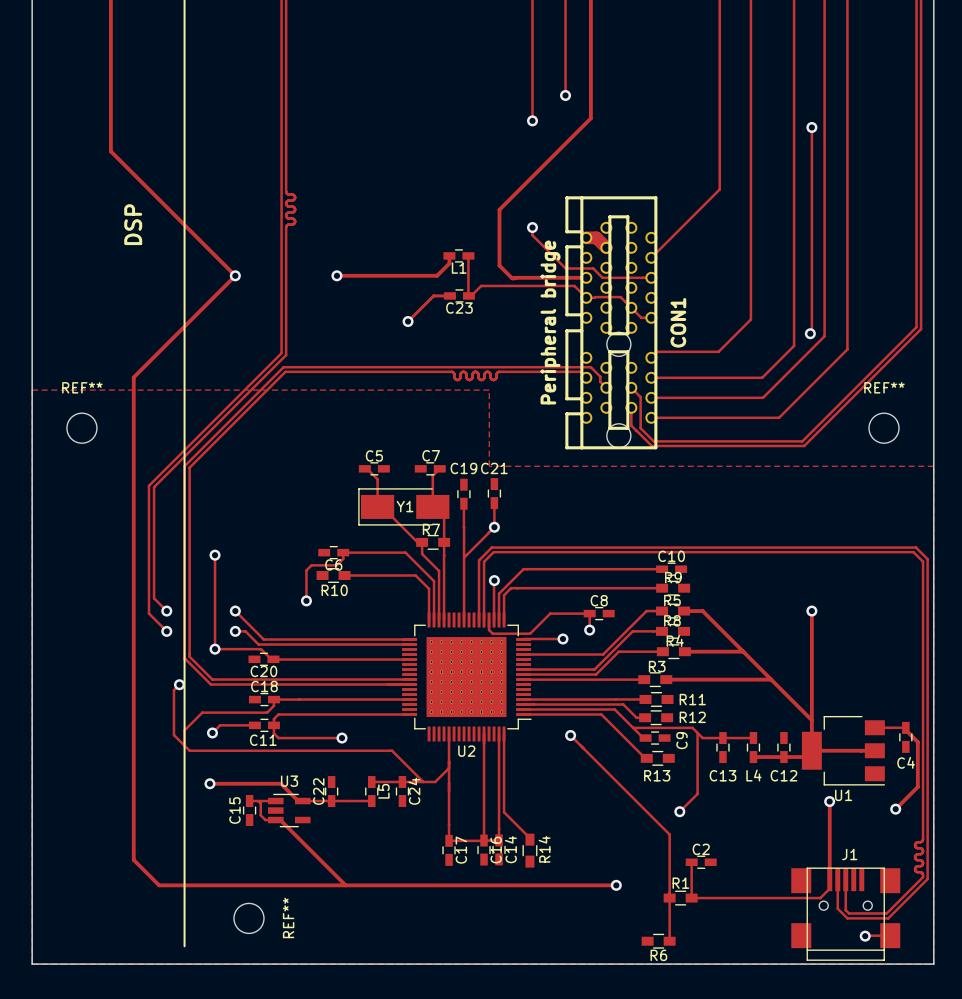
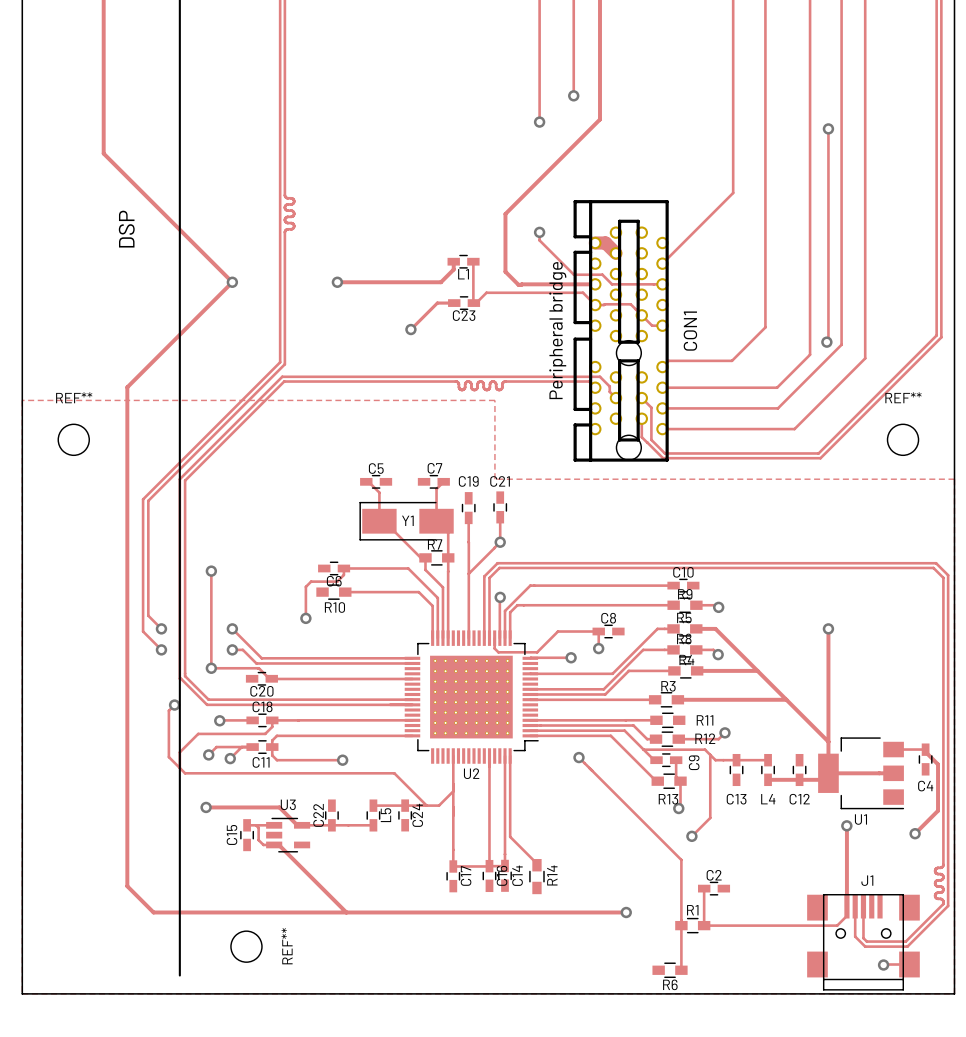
track: none -> (696, 605) (716, 605) (718, 607)
via: none -> (718, 607)
track: none -> (696, 649) (713, 649) (718, 654)
via: none -> (718, 654)
via: none -> (219, 720)
track: none -> (252, 720) (219, 720)
track: none -> (724, 732) (718, 739) (678, 739)
via: none -> (724, 732)
track: none -> (241, 747) (230, 758)
via: none -> (230, 758)
track: none -> (676, 760) (676, 776) (680, 781) (680, 806) (678, 808)
via: none -> (678, 808)

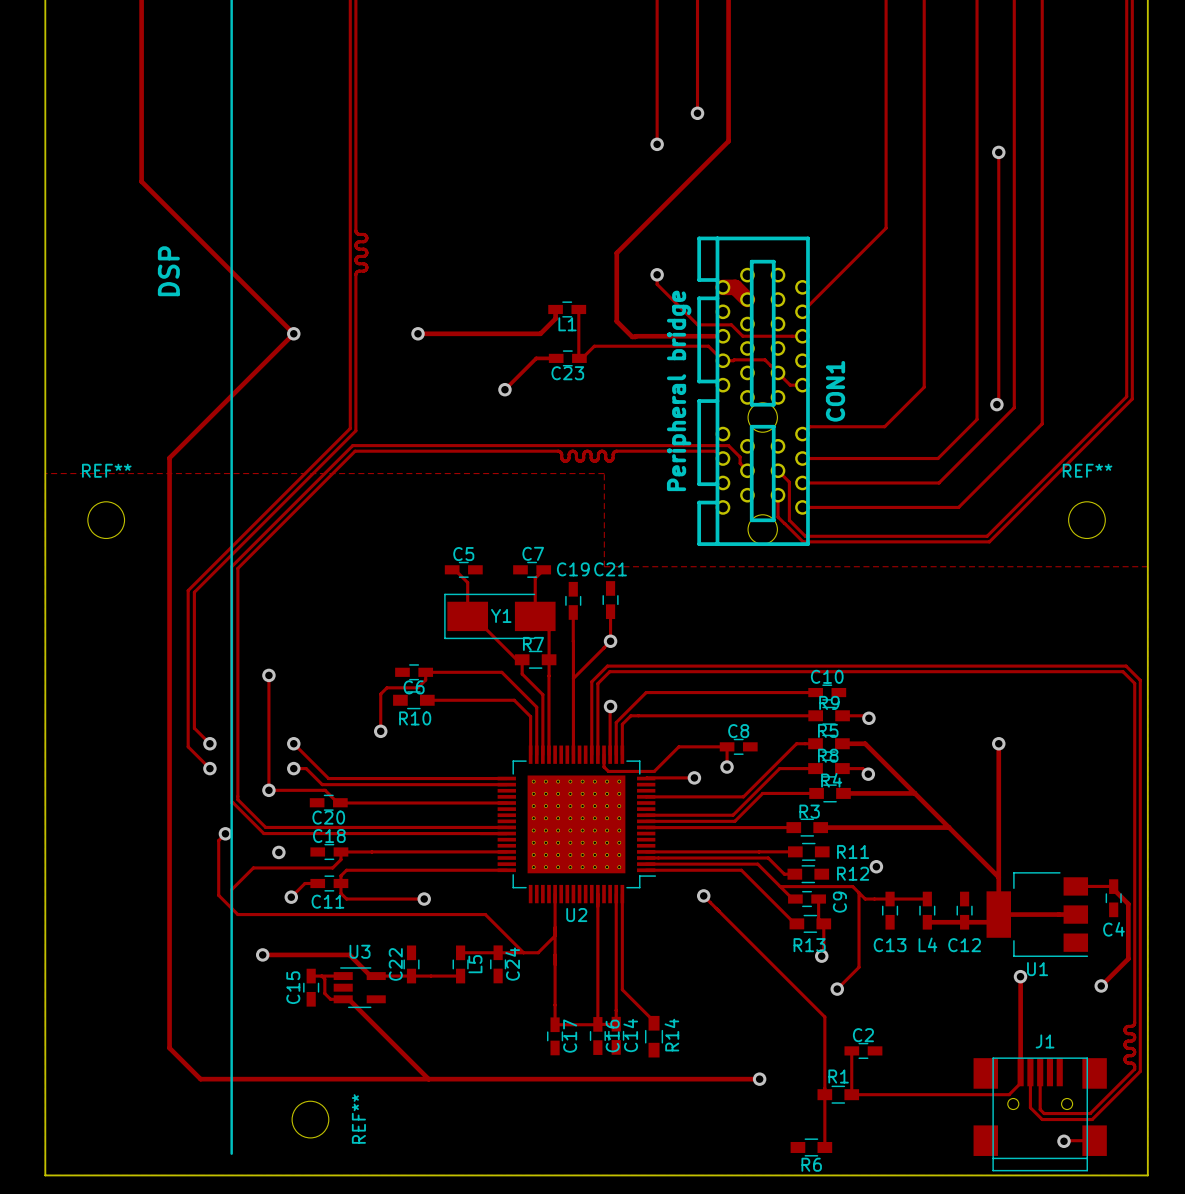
track: (220, 720) (252, 720) -> none
track: (724, 732) (718, 739) (678, 739) -> none
track: (241, 747) (216, 747) (208, 754) -> none
via: (208, 754) -> none

